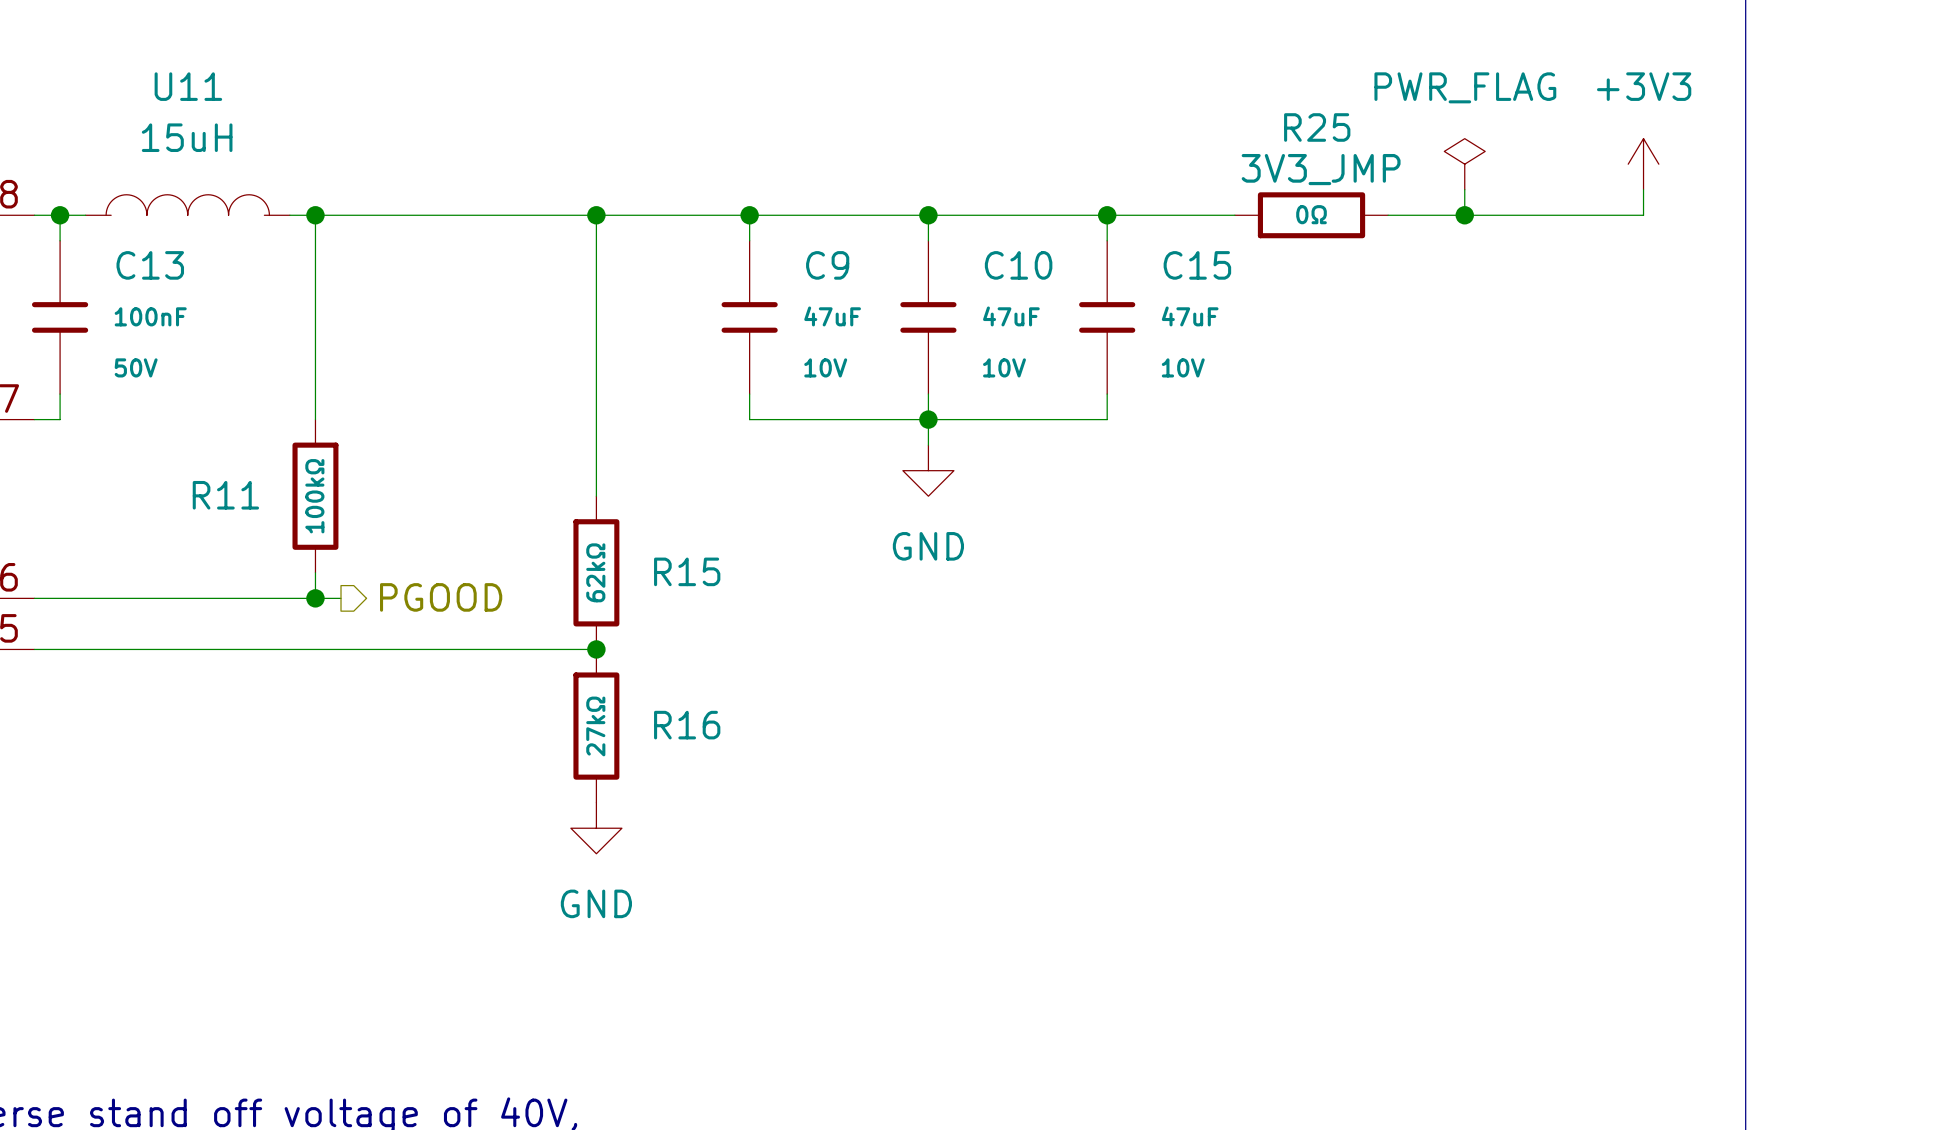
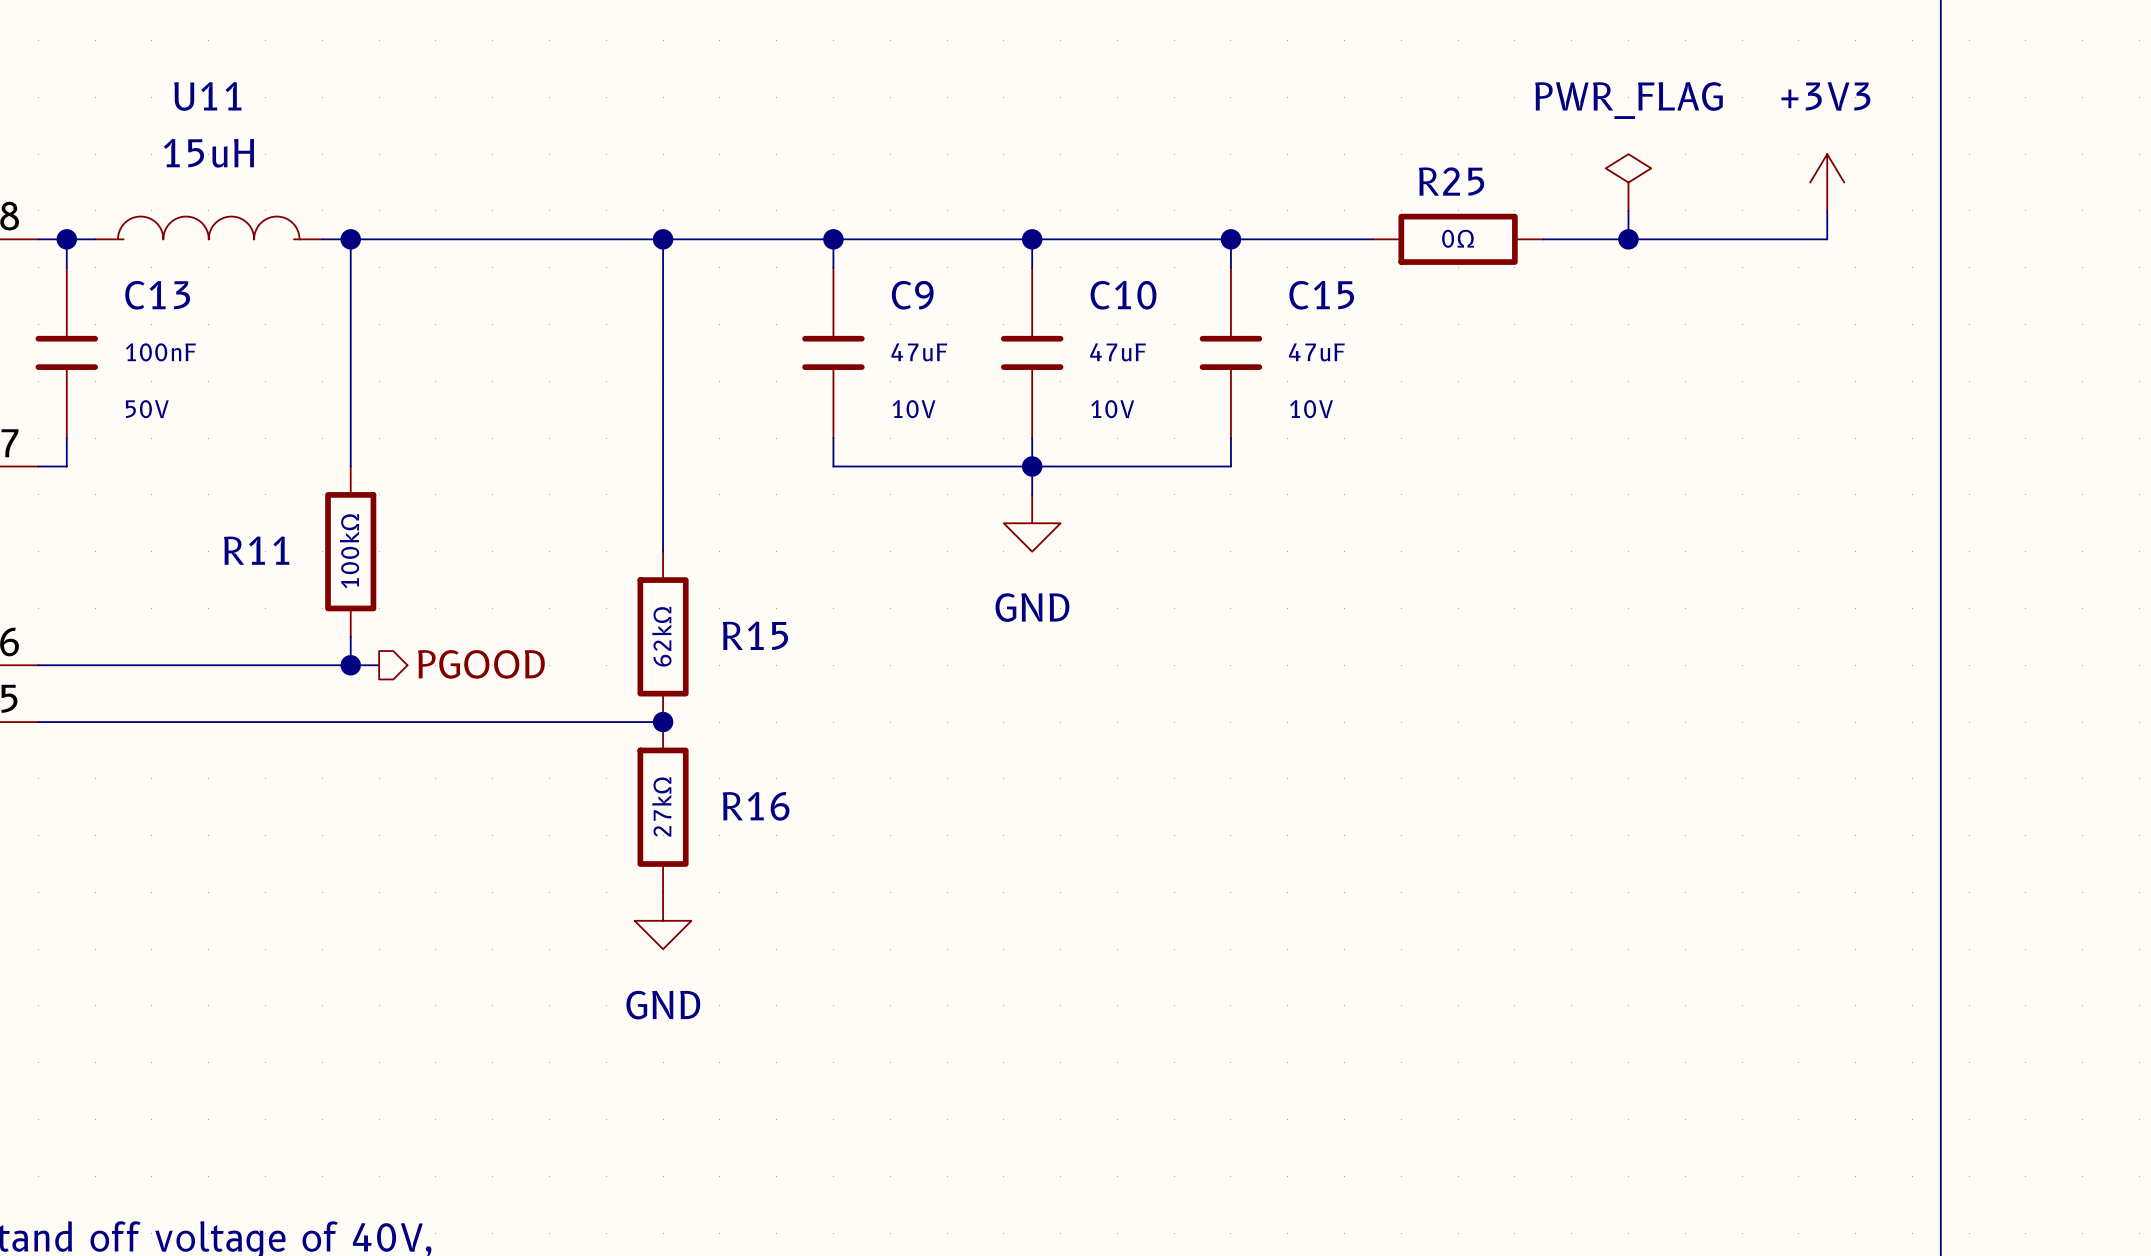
R25 name position: R25 (1317, 127) -> R25 (1451, 181)
R25 text: 3V3_JMP (1321, 169) -> none

